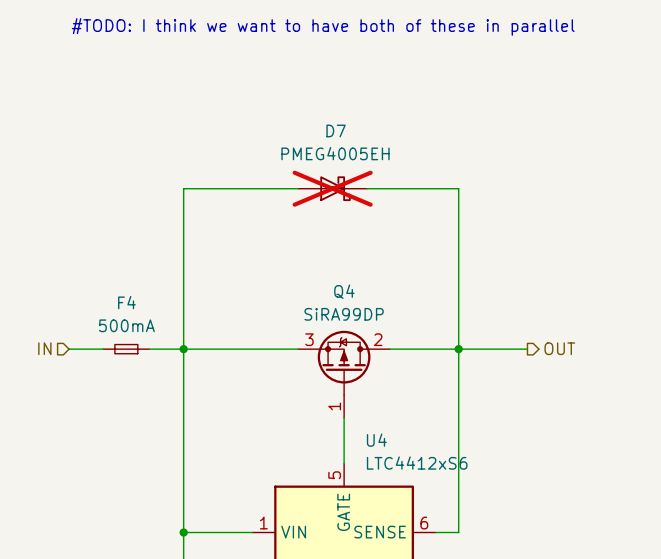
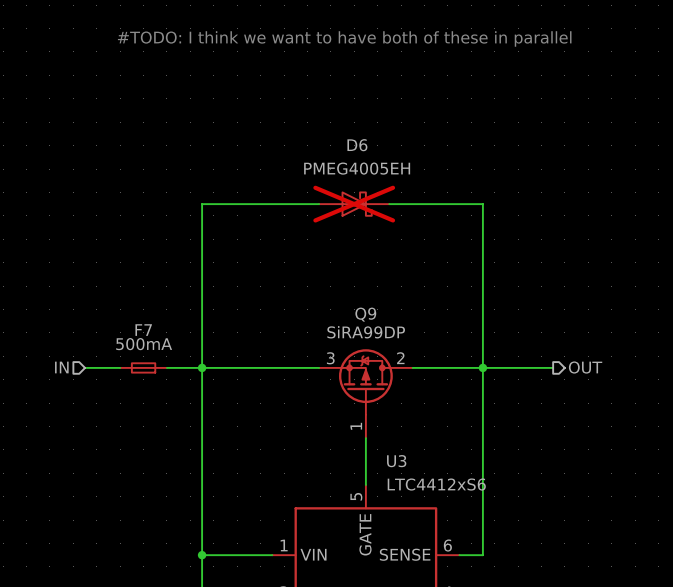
D7 name: D7 (336, 130) -> D6 (357, 145)
Q4 name: Q4 (344, 291) -> Q9 (365, 314)
F4 name: F4 (126, 302) -> F7 (143, 330)
U4 name: U4 (376, 440) -> U3 (396, 461)

